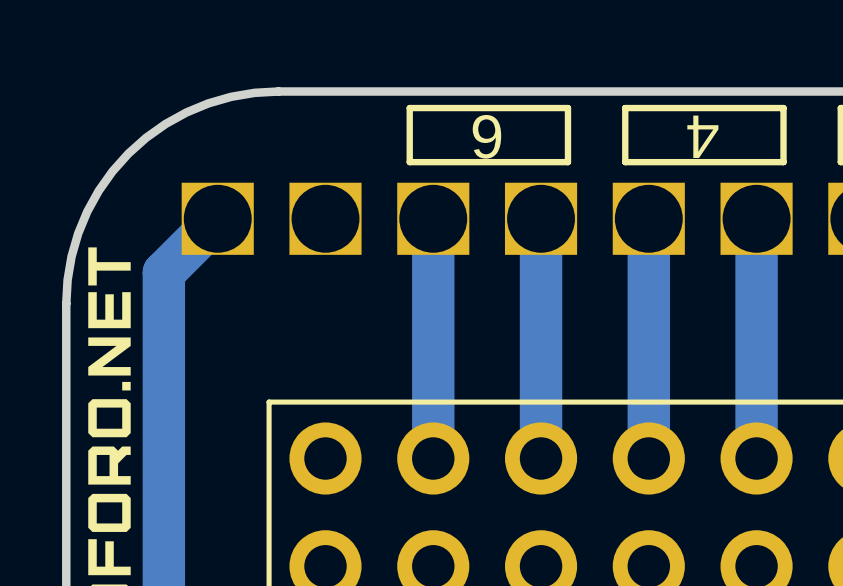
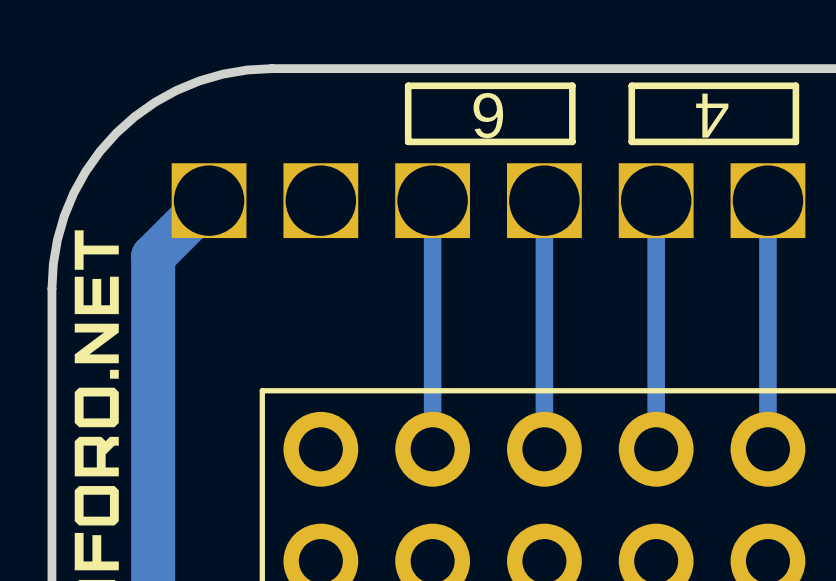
track width: thick (433, 218) (433, 458) -> thin (432, 200) (432, 449)
track width: thick (541, 218) (541, 458) -> thin (544, 200) (544, 449)
track width: thick (648, 218) (648, 458) -> thin (656, 200) (656, 449)
track width: thick (756, 218) (756, 458) -> thin (767, 200) (767, 449)

